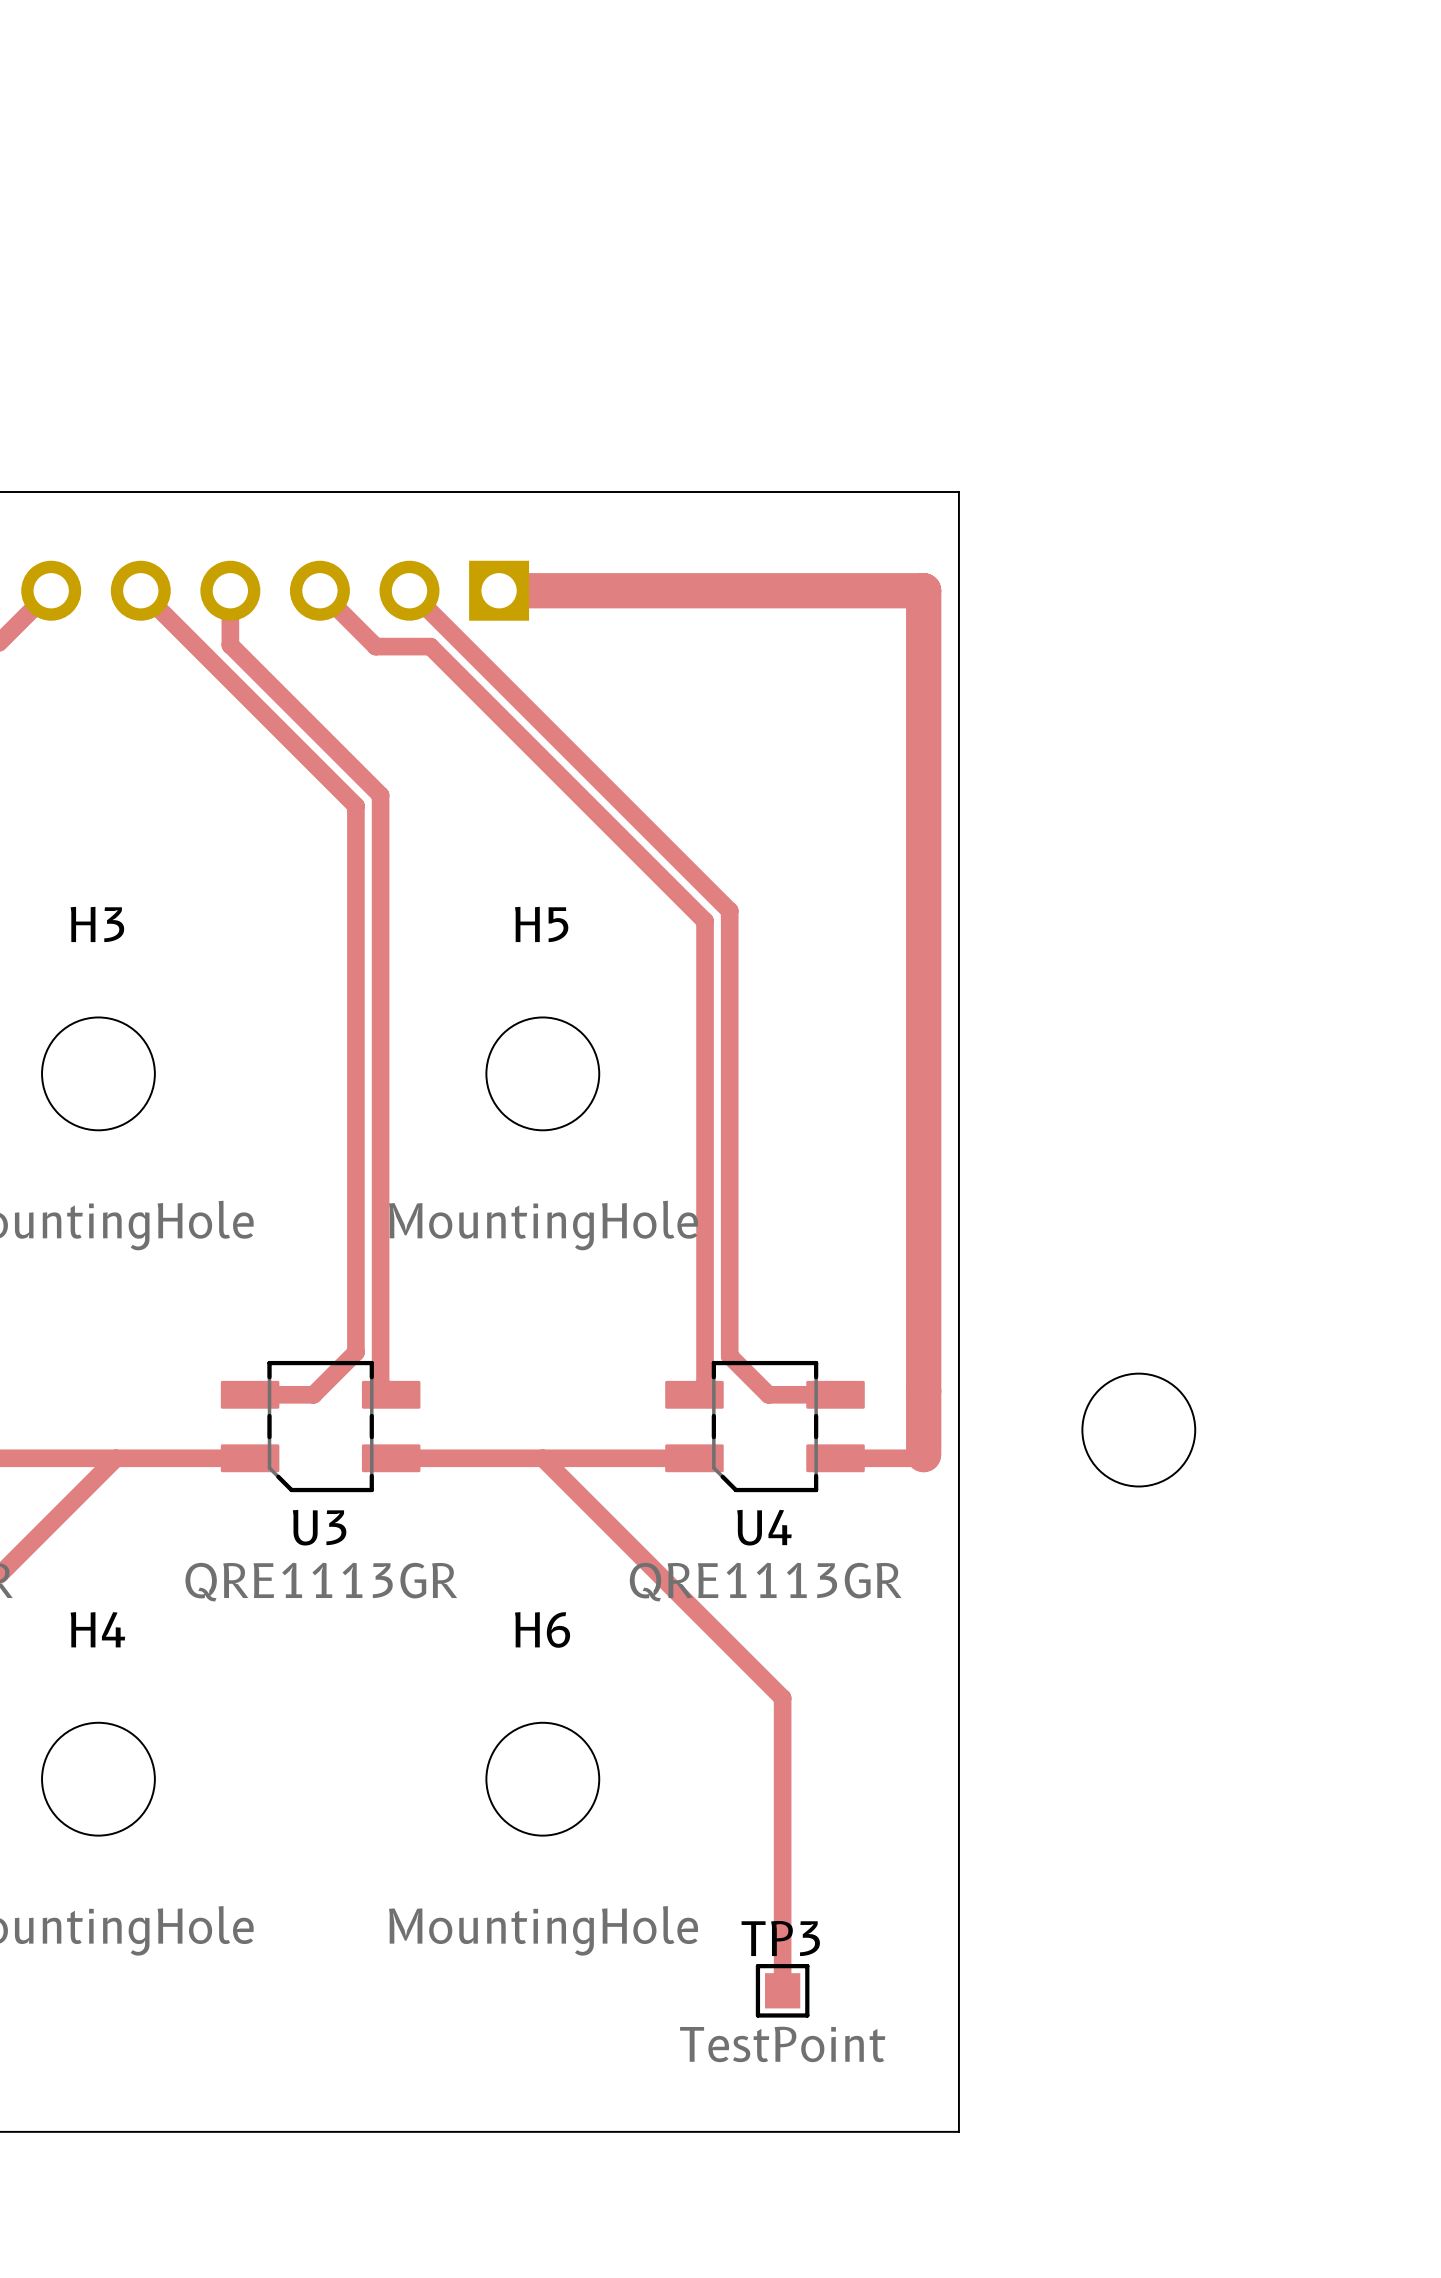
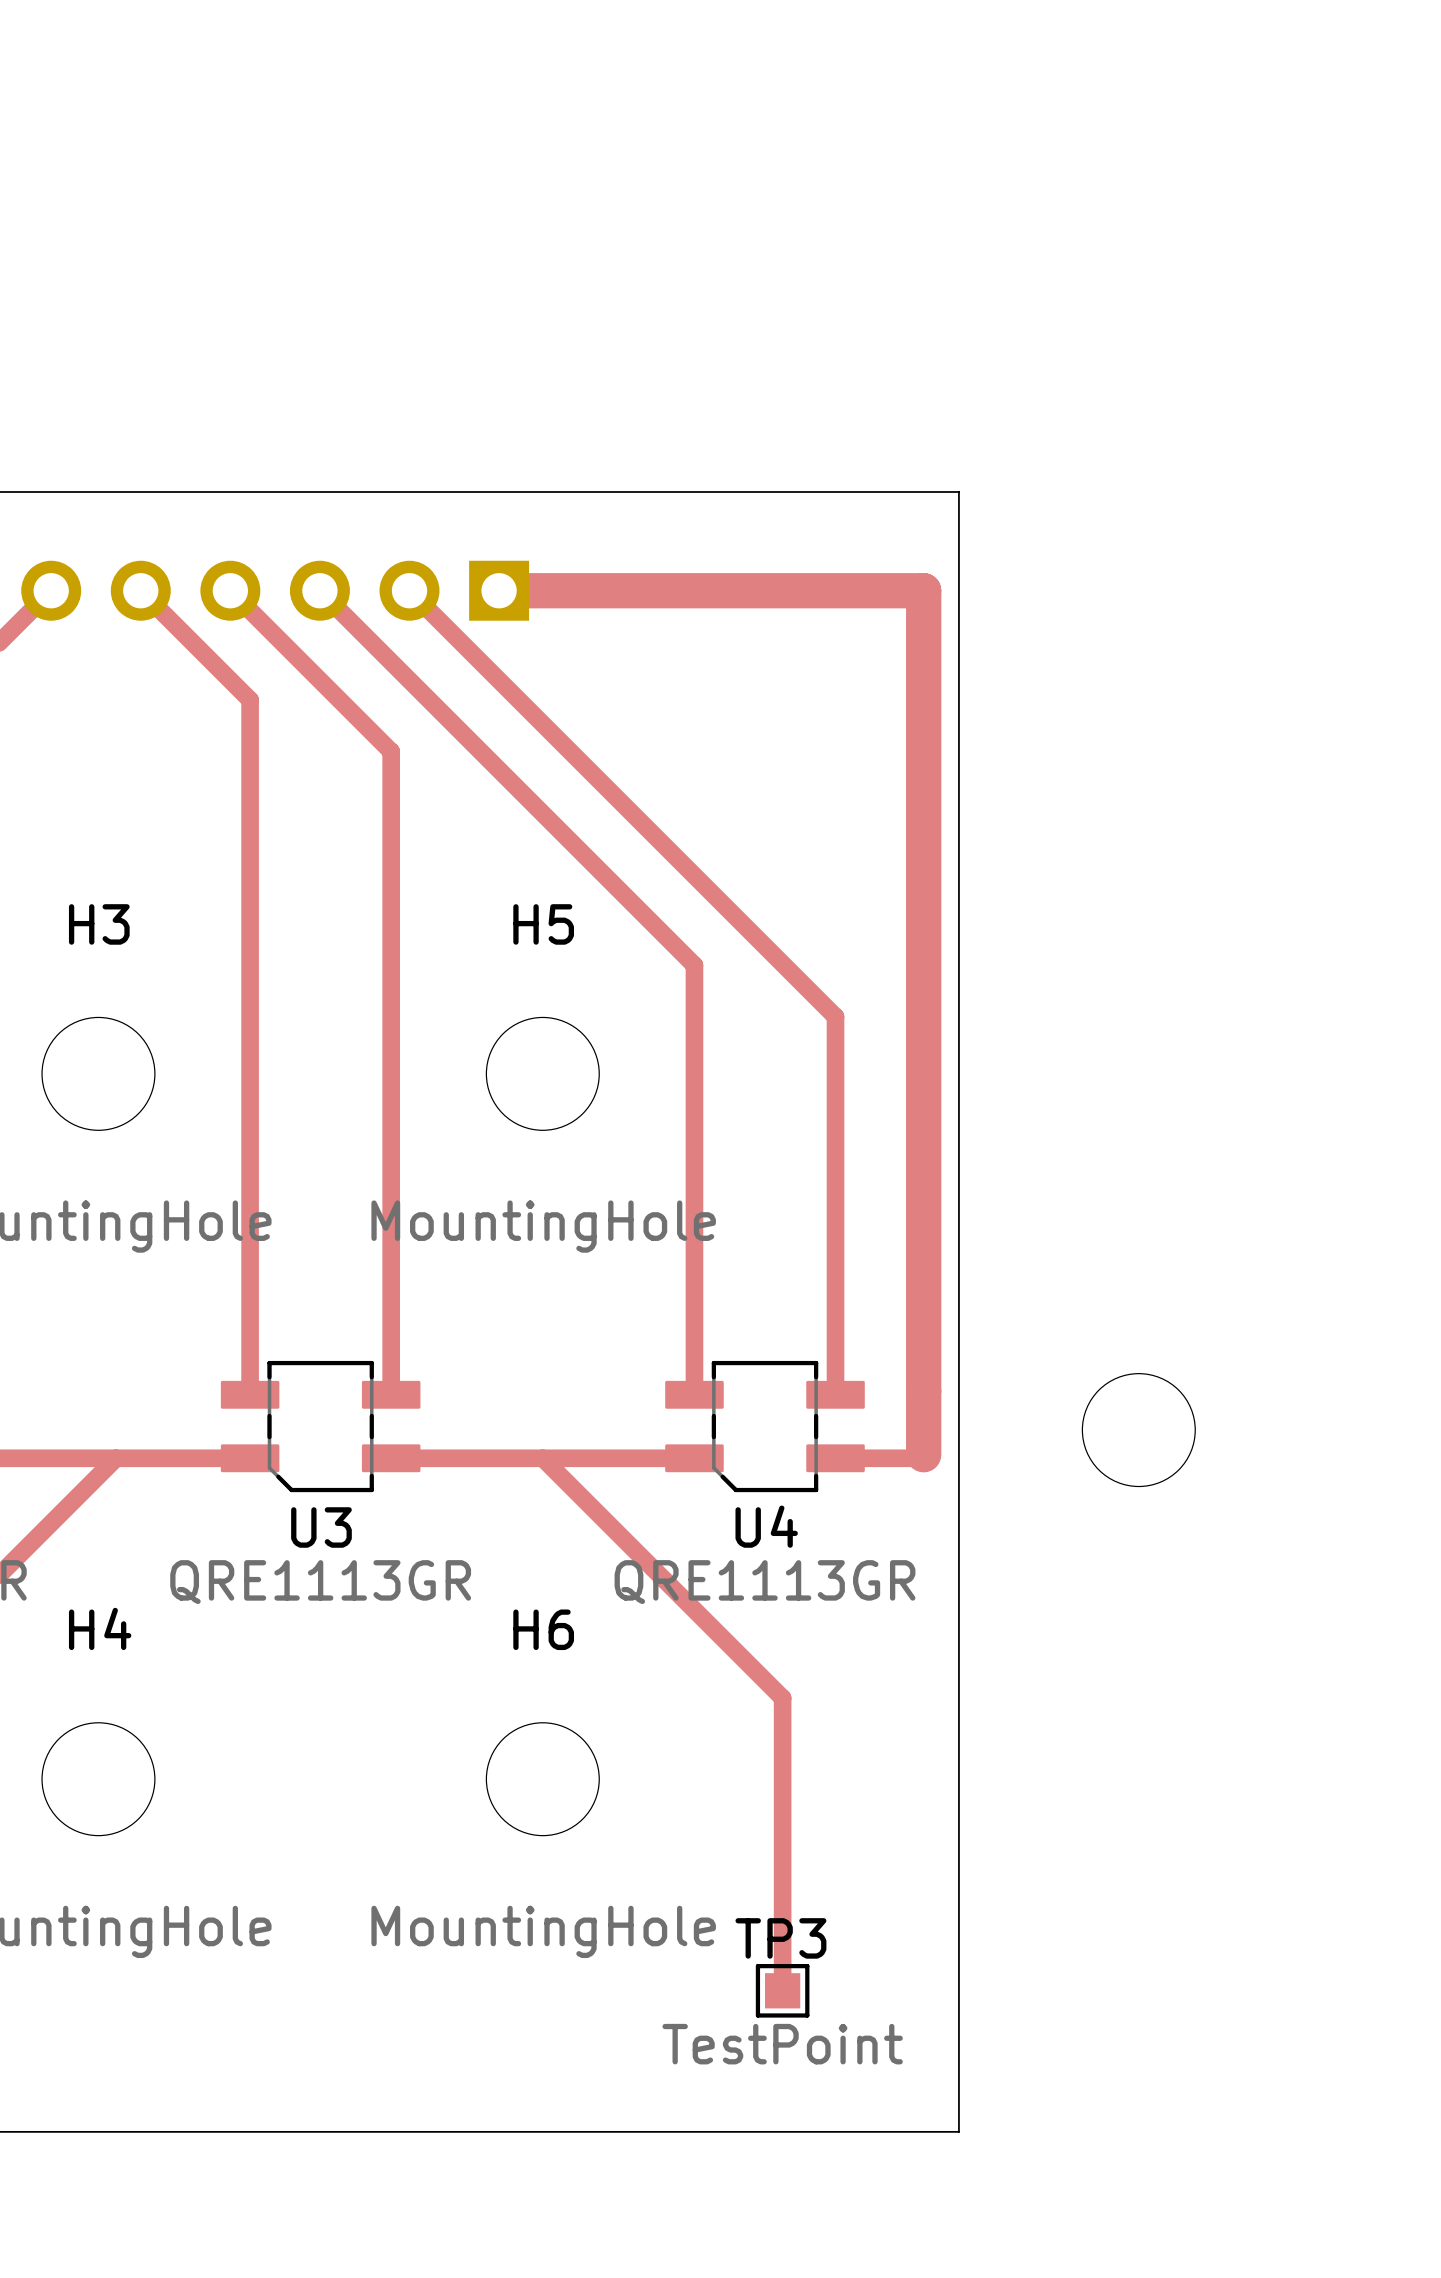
top track: (230, 590) (230, 645) (380, 795) (380, 1384) (391, 1394) -> (230, 590) (391, 751) (391, 1394)
top track: (375, 646) (430, 646) (705, 921) (705, 1384) (694, 1394) -> (375, 646) (694, 965) (694, 1394)
top track: (250, 700) (355, 805) (355, 1352) (313, 1394) (250, 1394) -> (250, 700) (250, 1394)
top track: (729, 910) (729, 1356) (768, 1394) (821, 1394) -> (729, 910) (835, 1016) (835, 1394)

